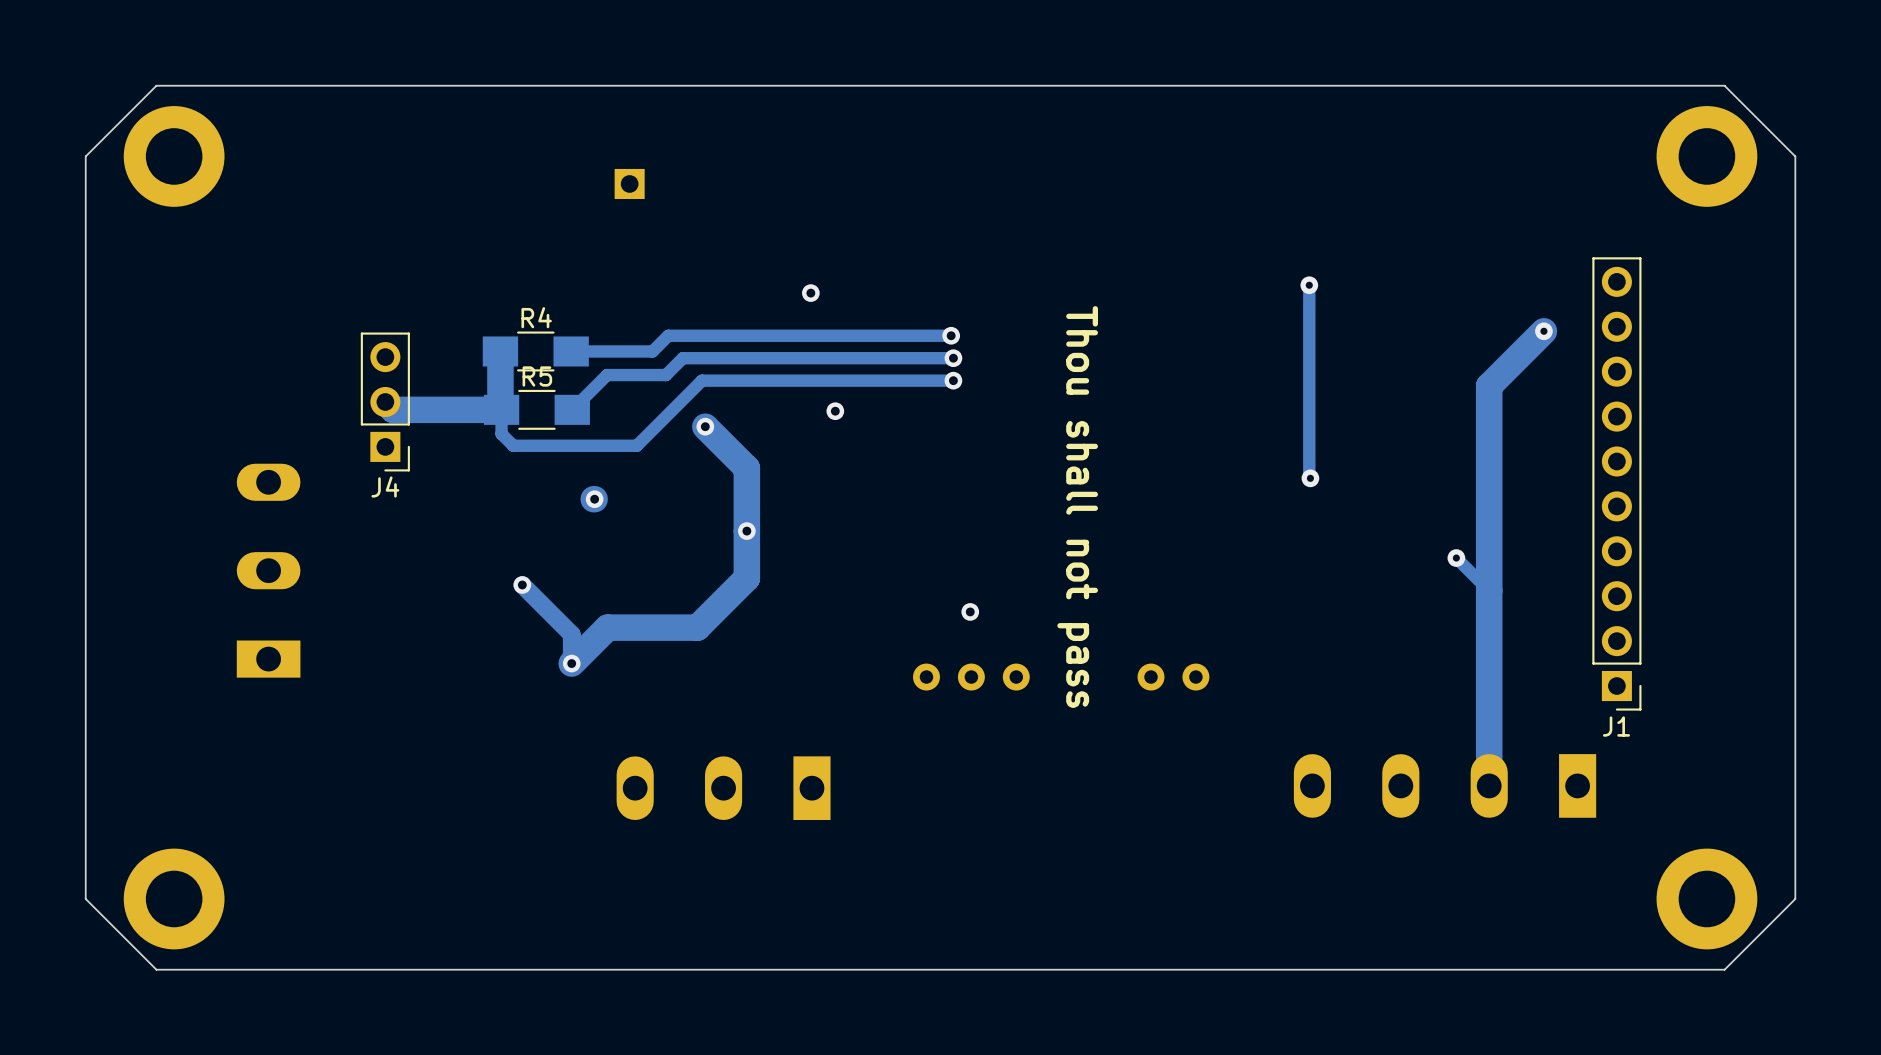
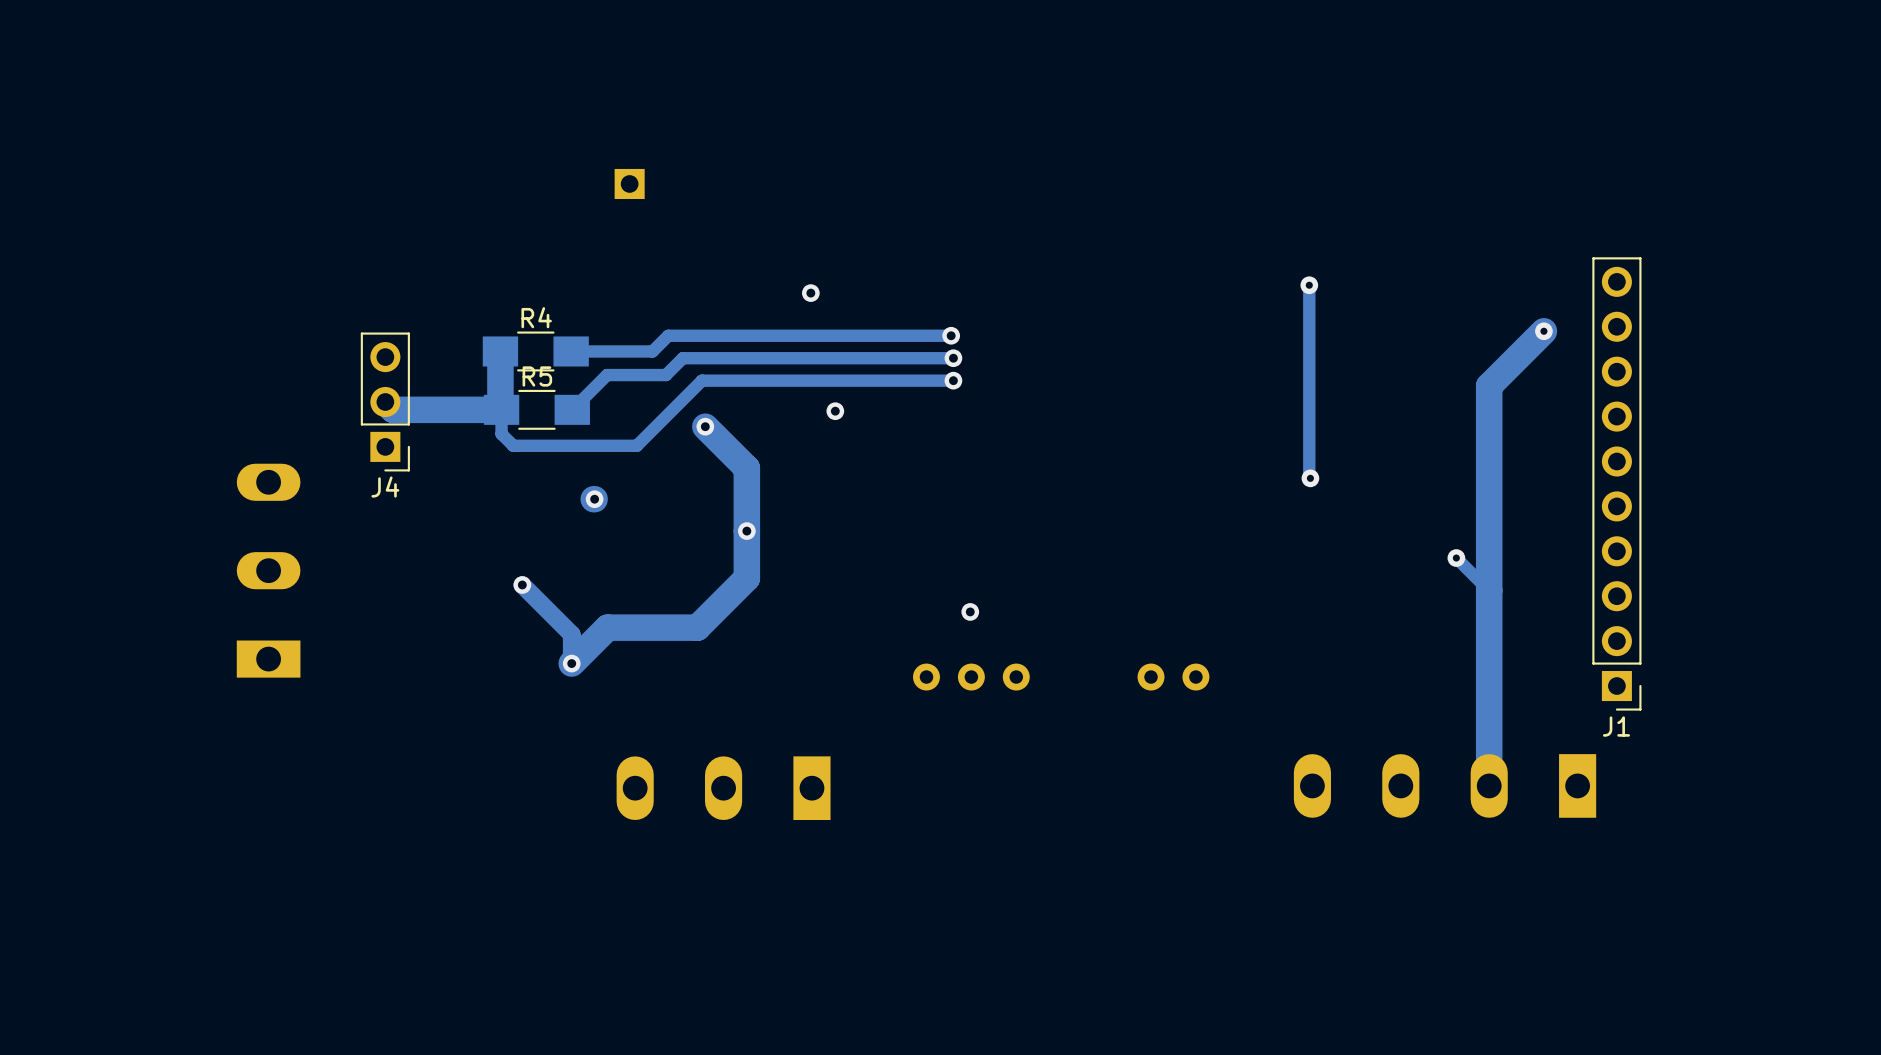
board edge: (1724, 85) (1795, 156) (1795, 898) (1724, 969) (156, 969) (85, 898) (85, 156) (156, 85) (1724, 85) -> none
part: (174, 156) -> none
part: (1706, 156) -> none
text: Thou shall not pass (1077, 507) -> none
part: (174, 898) -> none
part: (1706, 898) -> none

